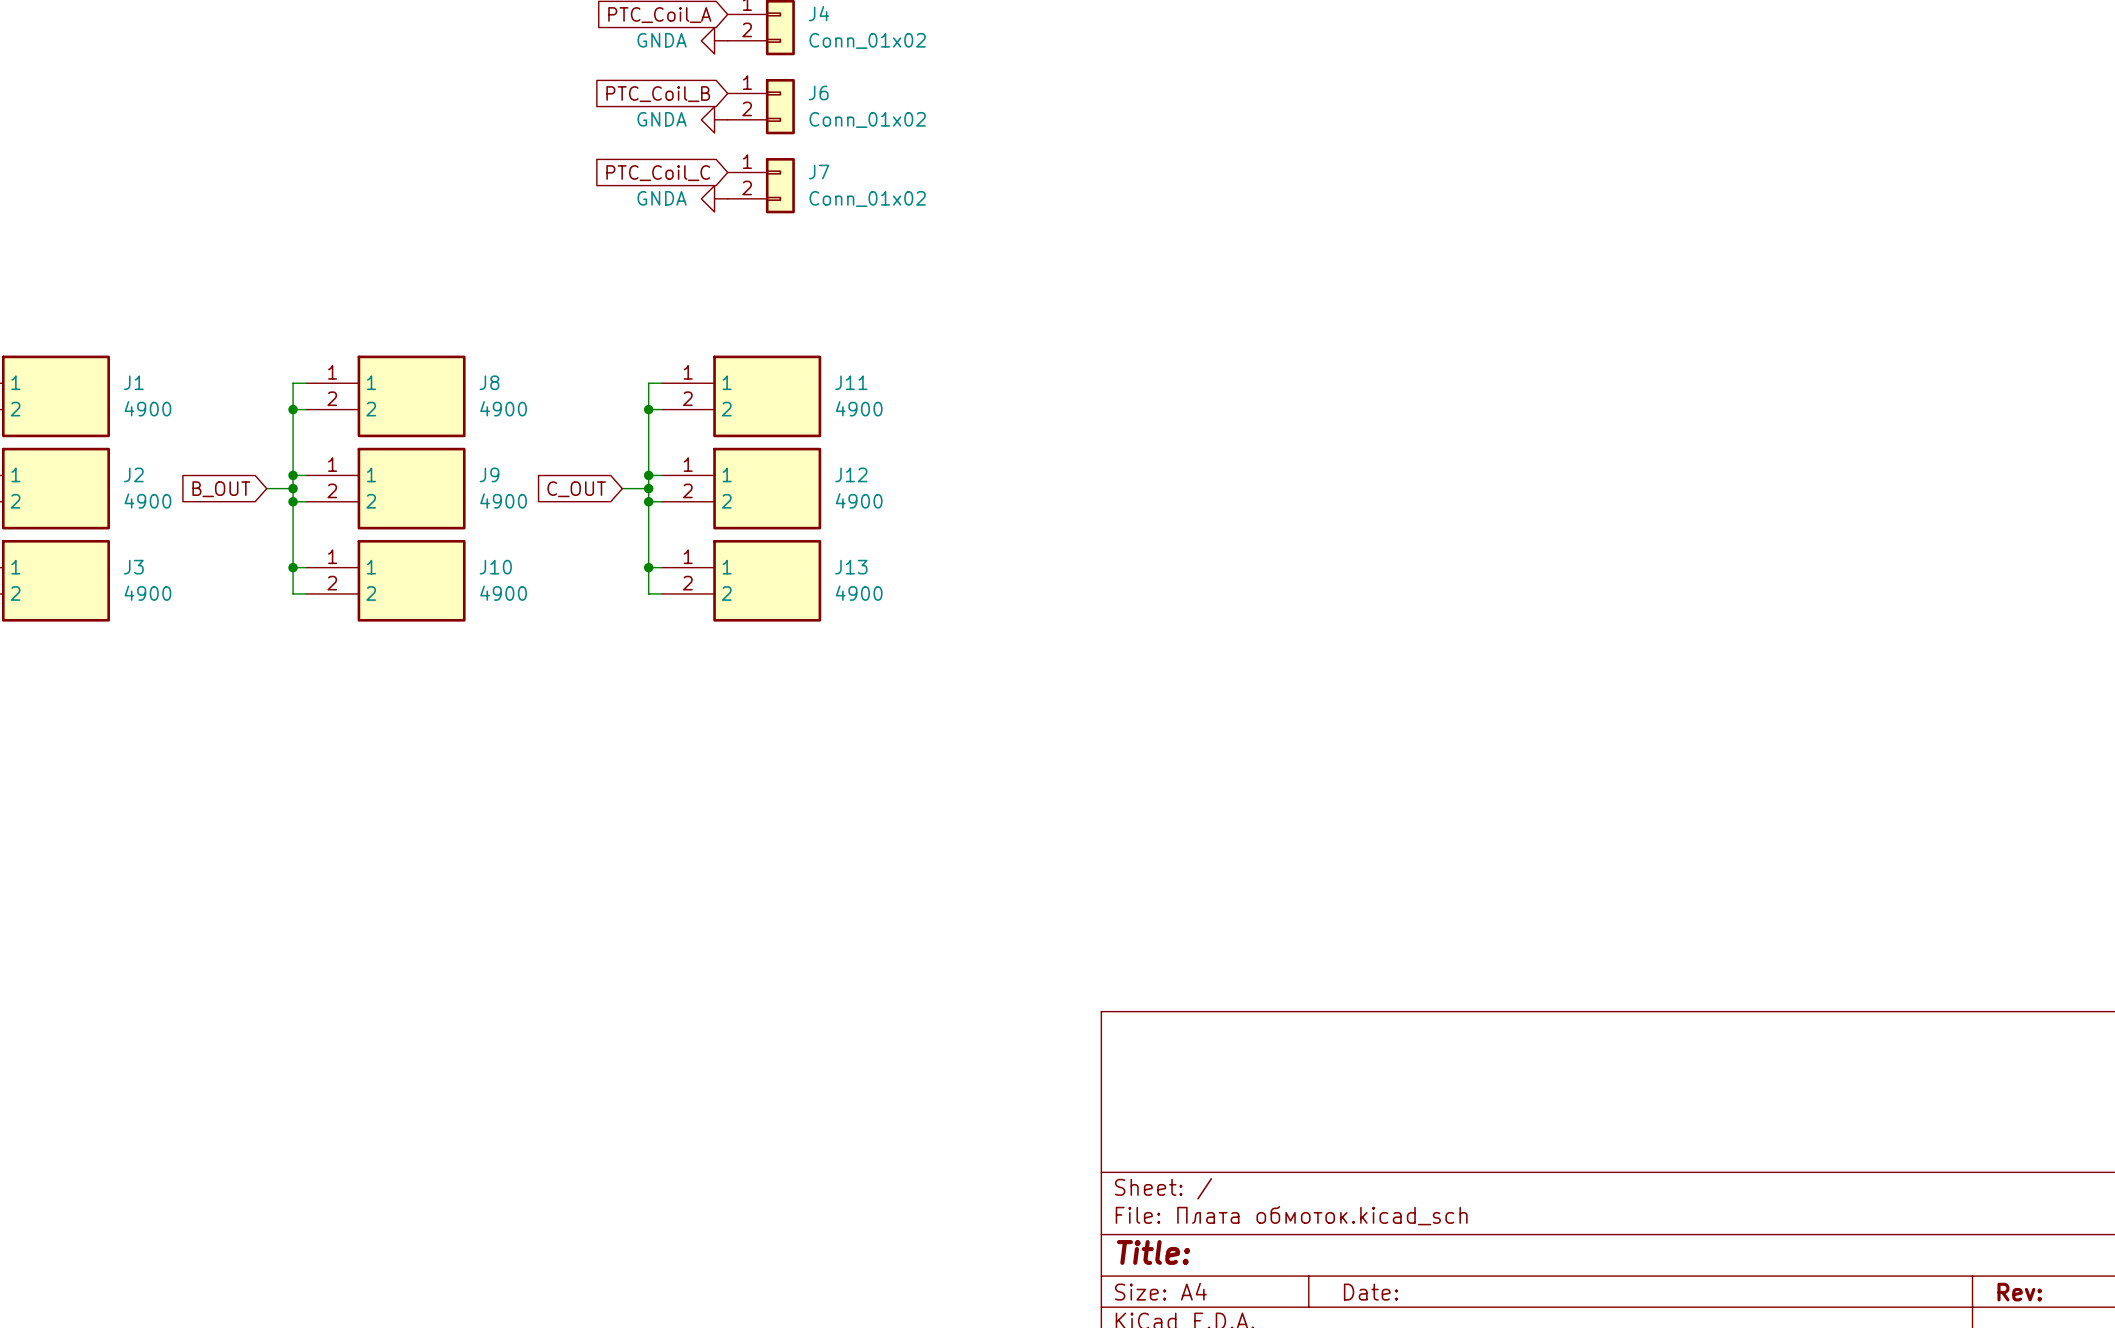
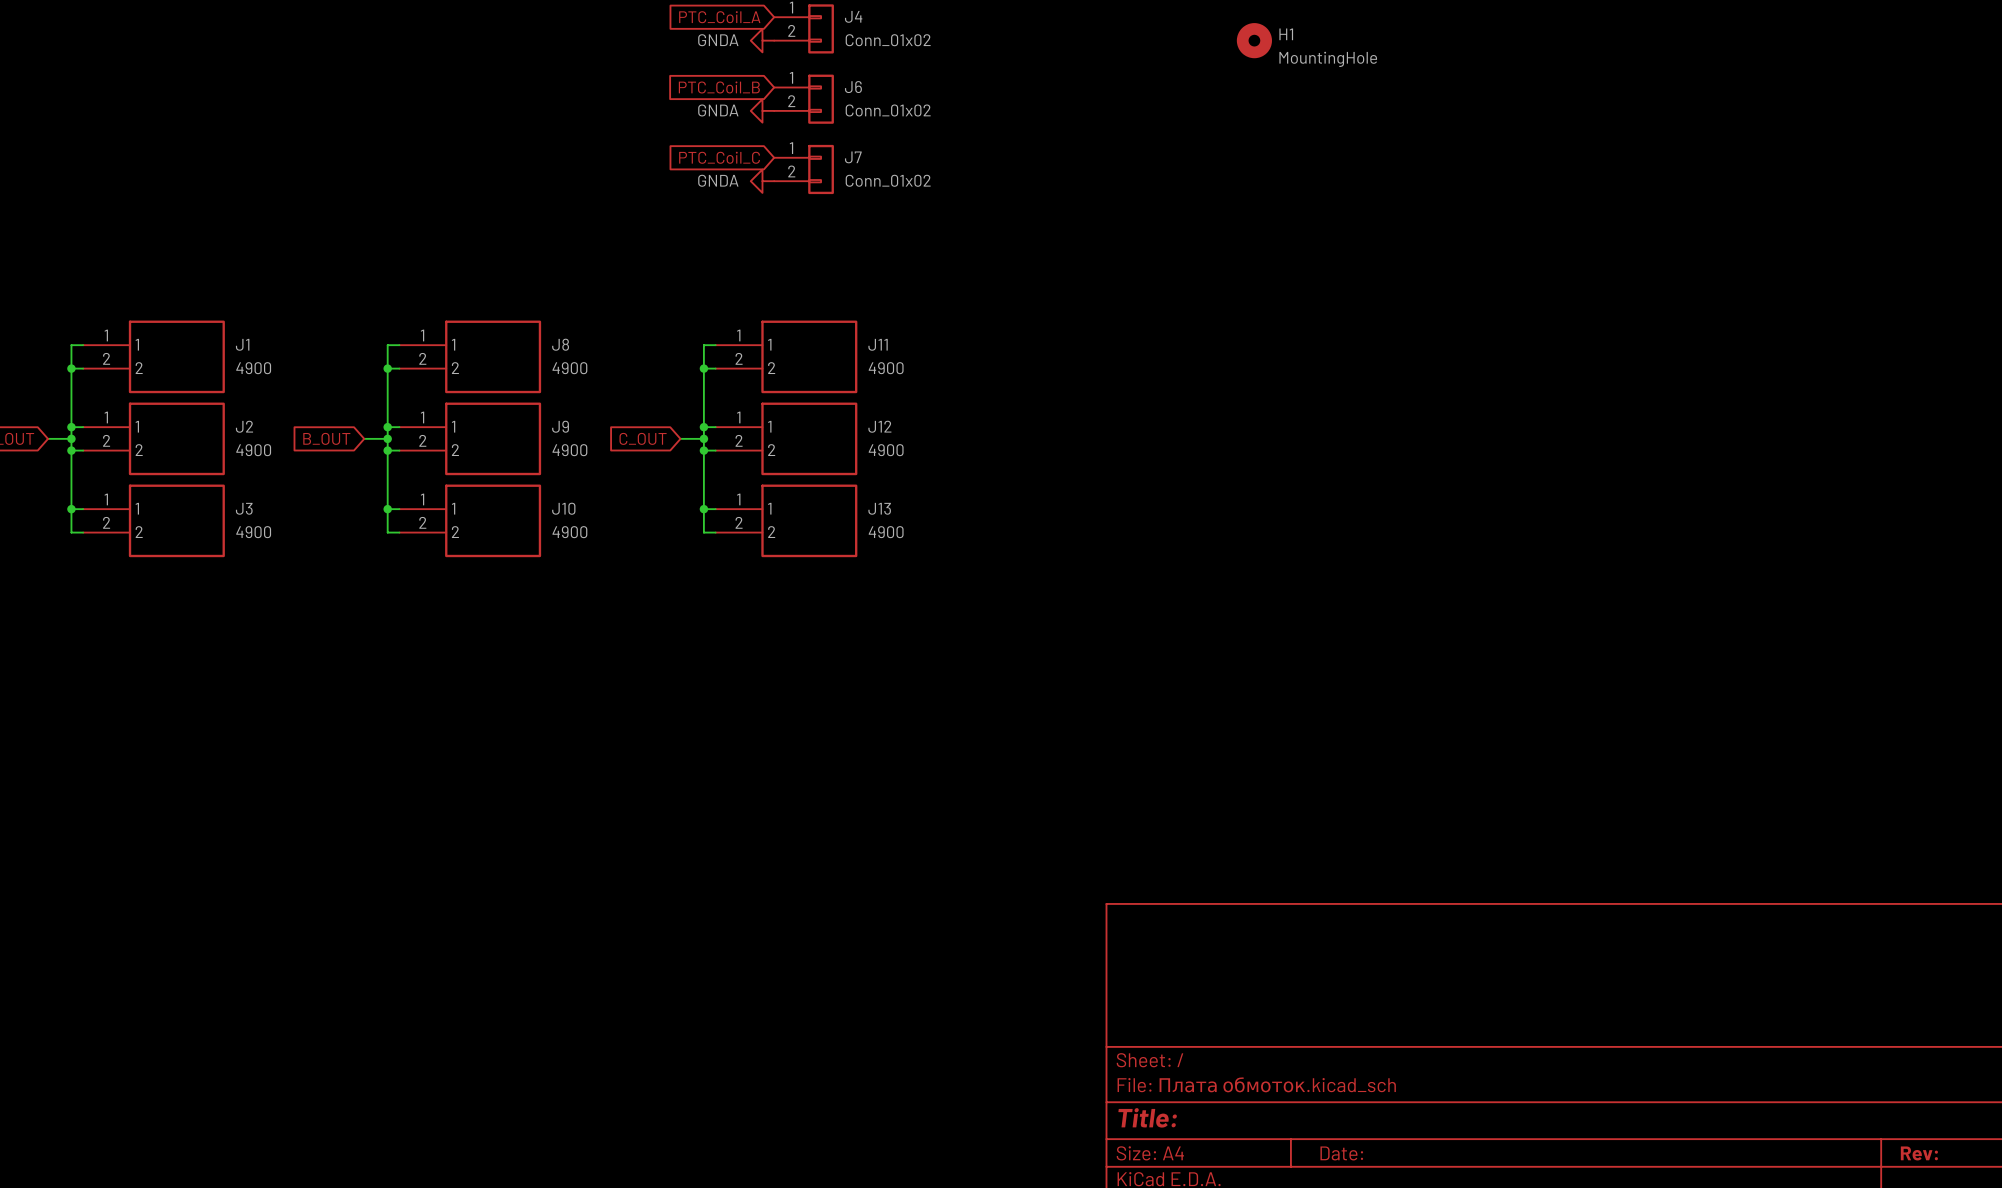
H1: none -> MountingHole (1254, 40)

